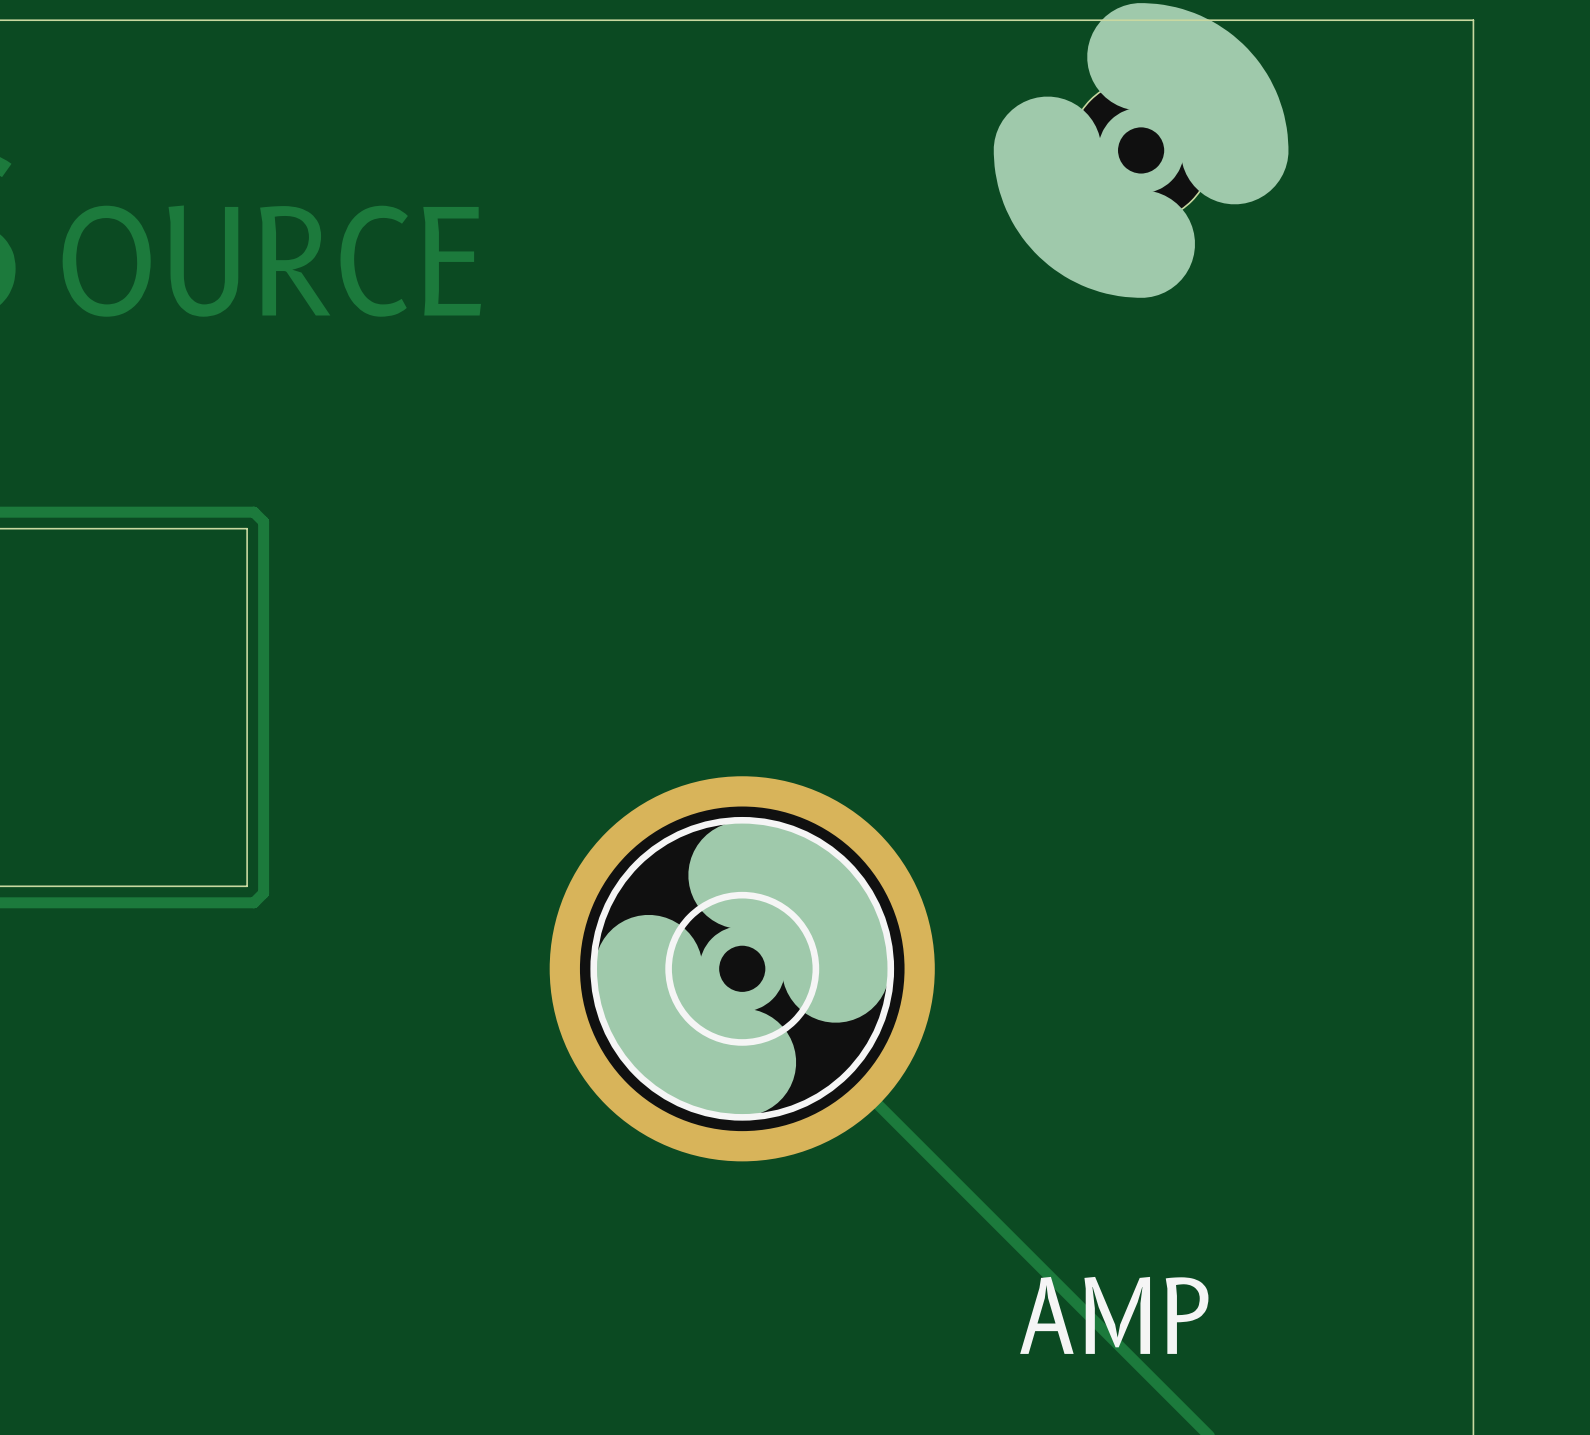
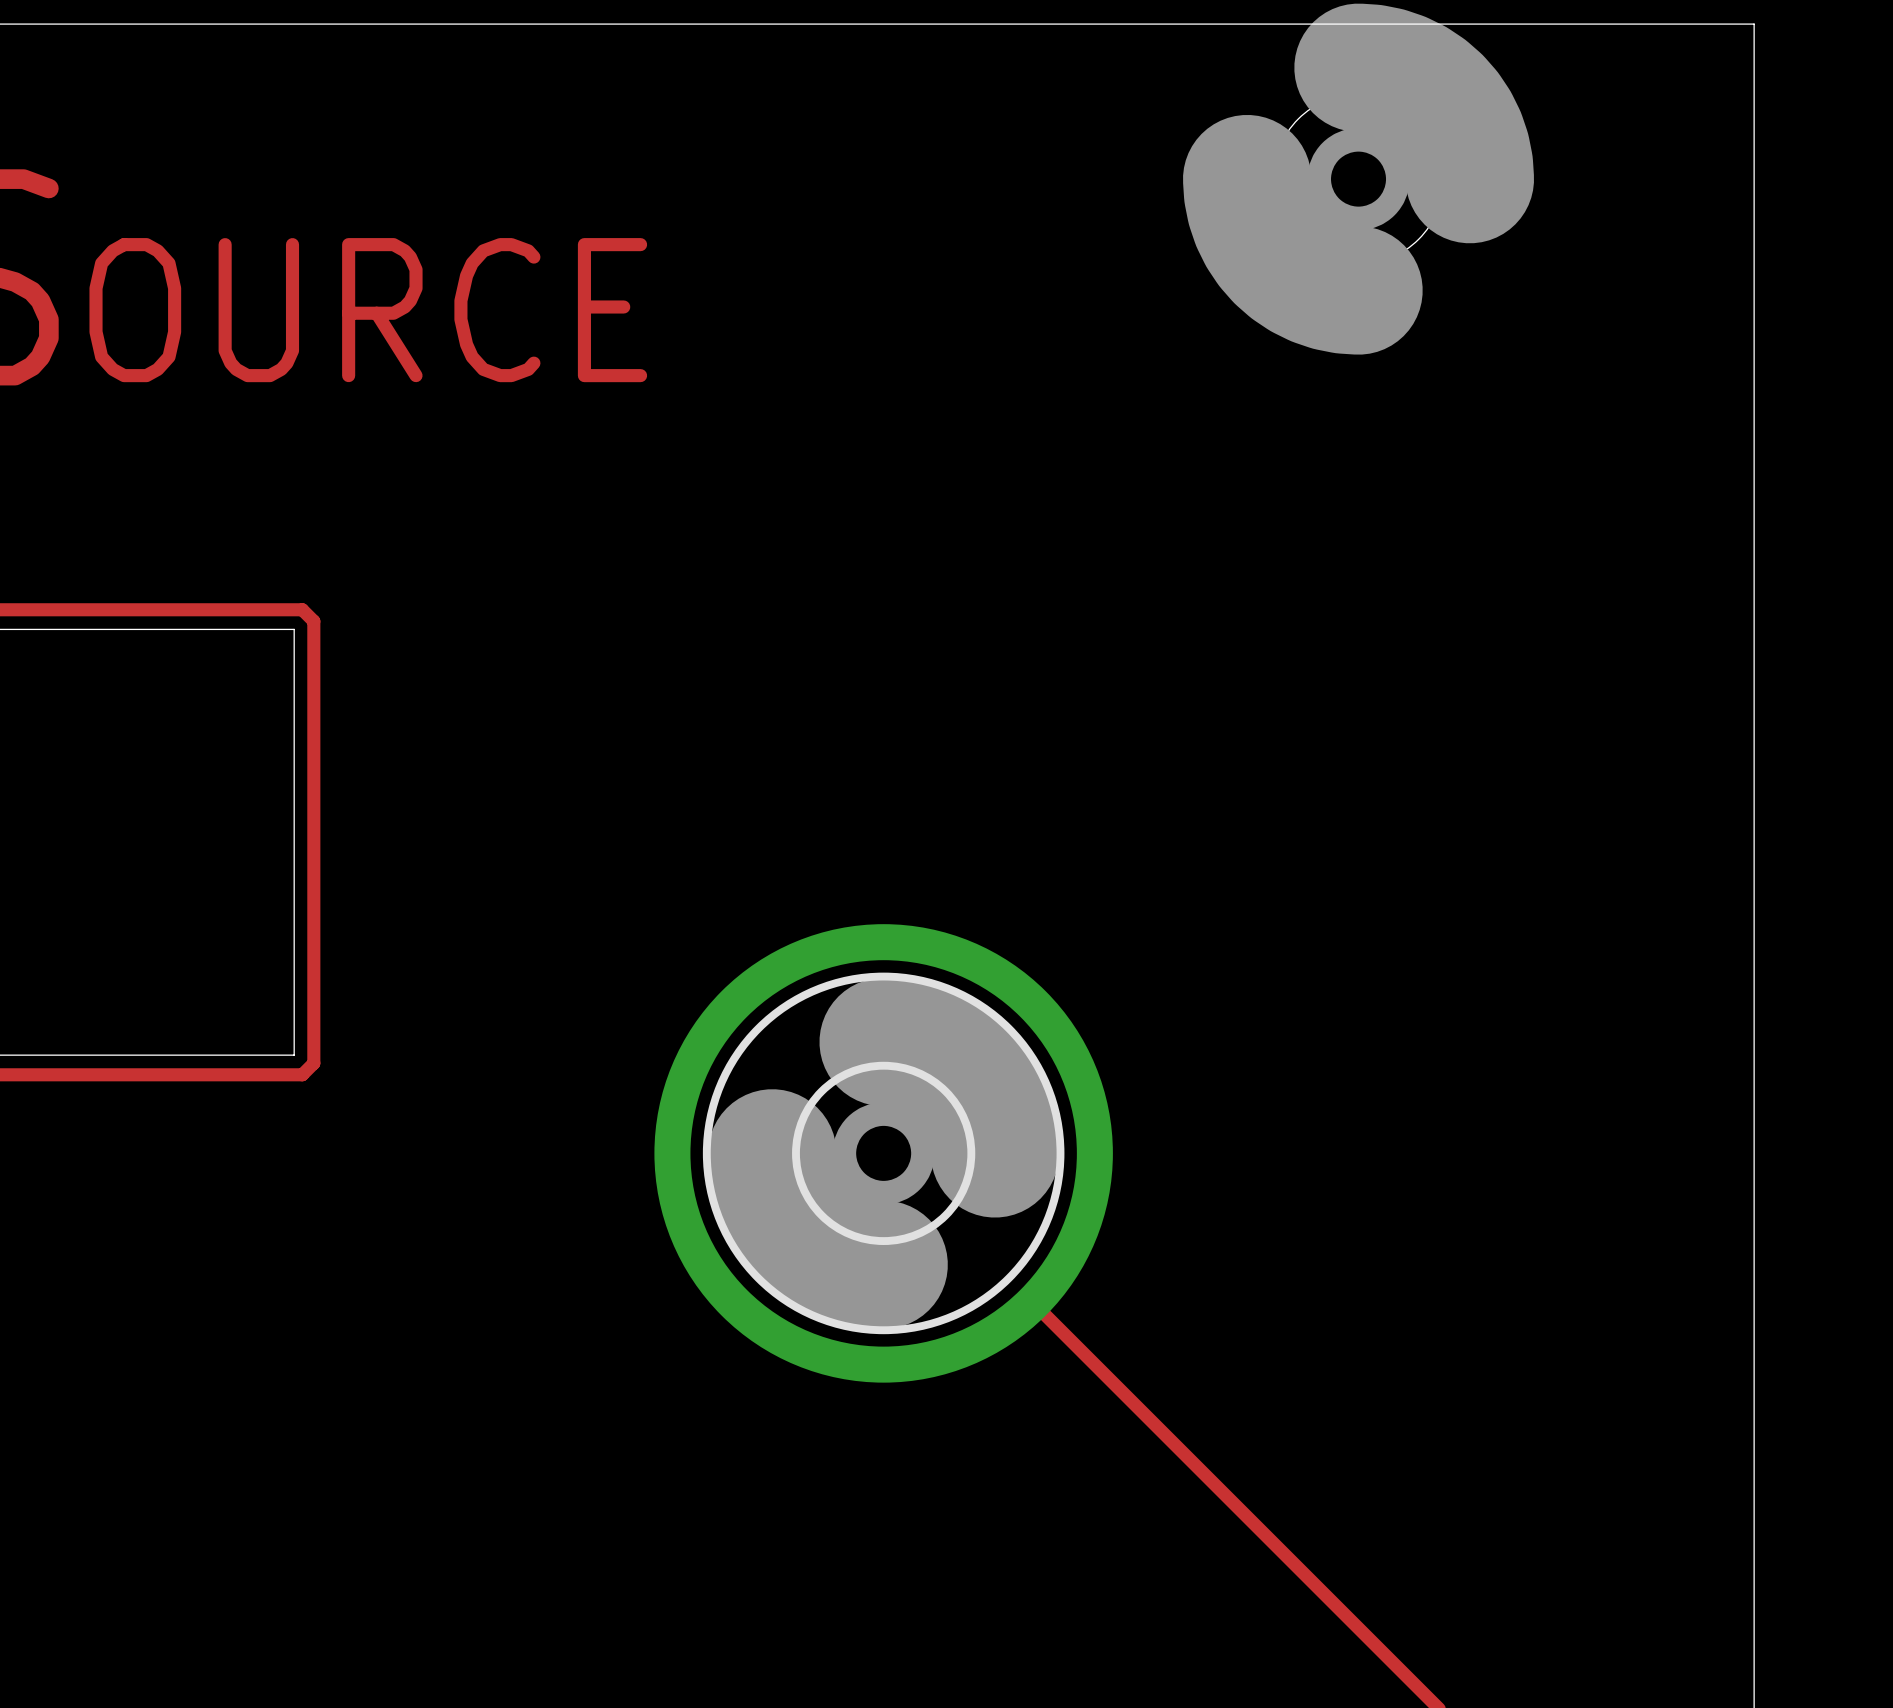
text: AMP (1114, 1315) -> none

